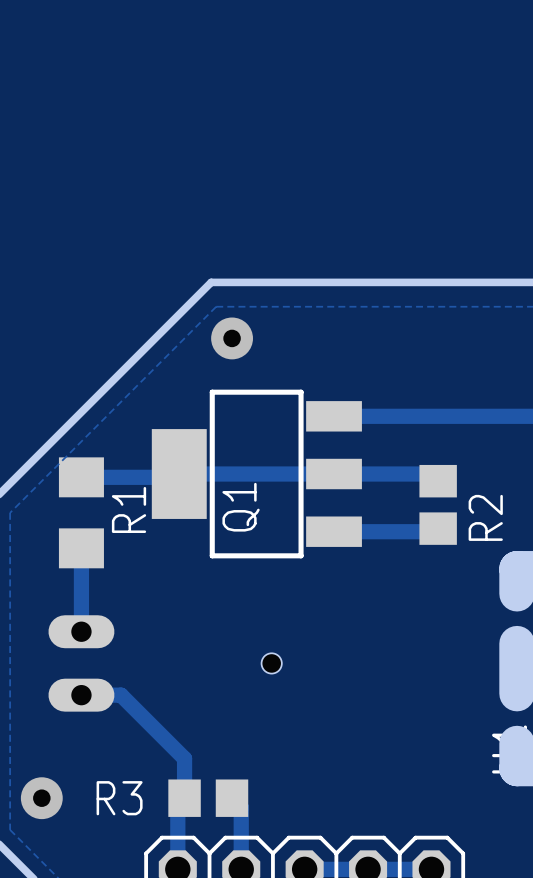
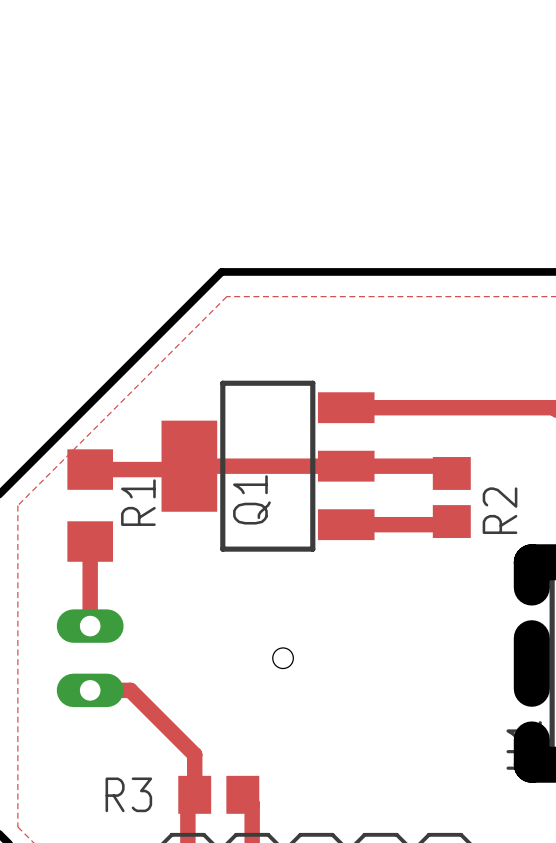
via: (232, 338) -> none
via: (41, 798) -> none

